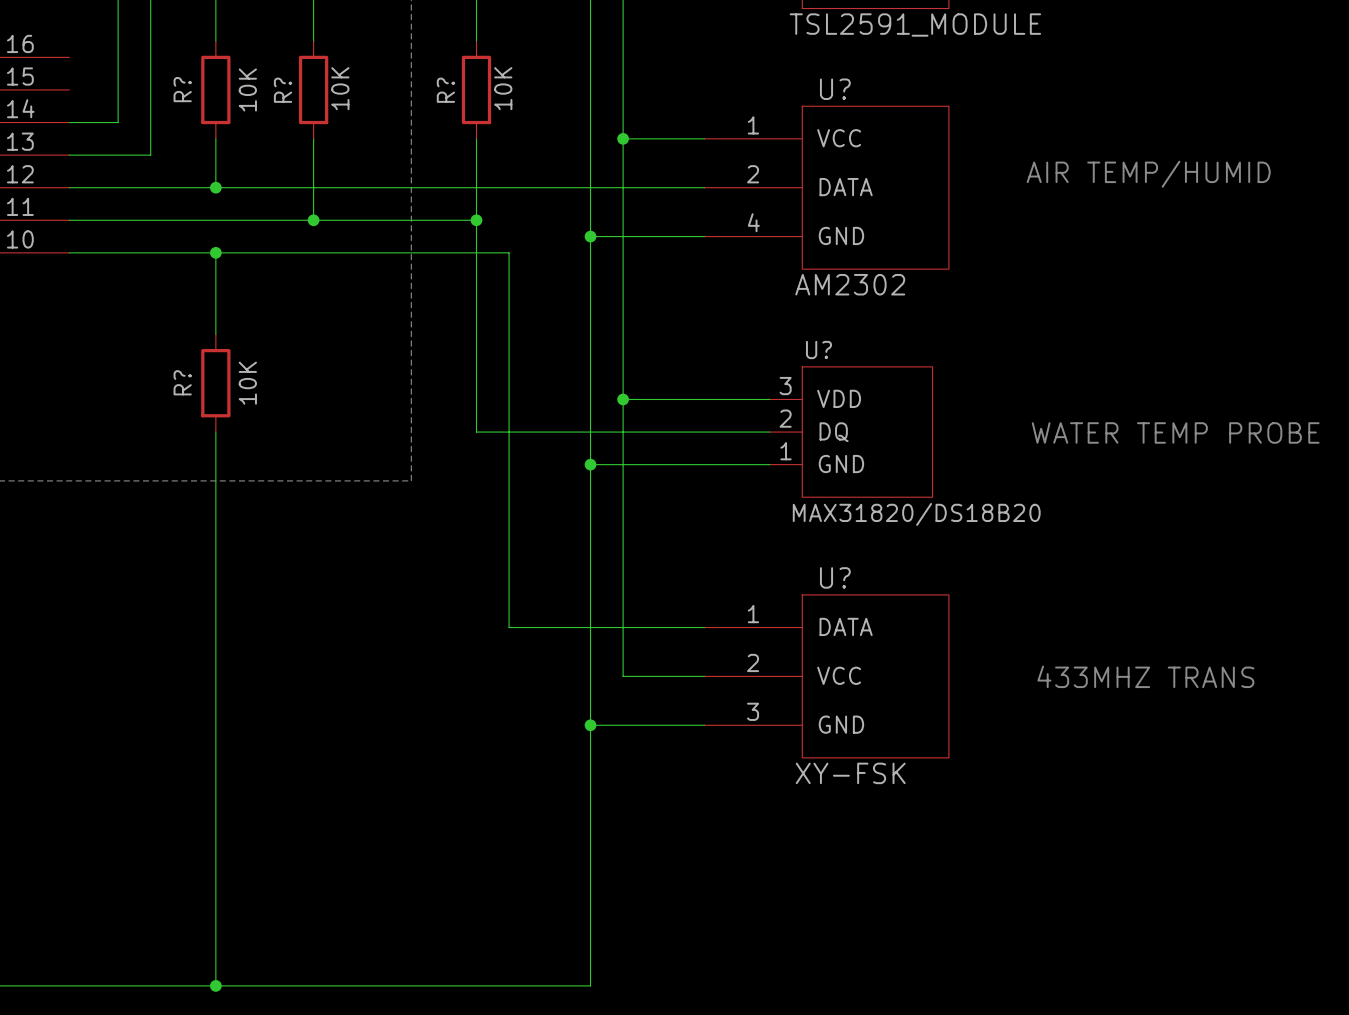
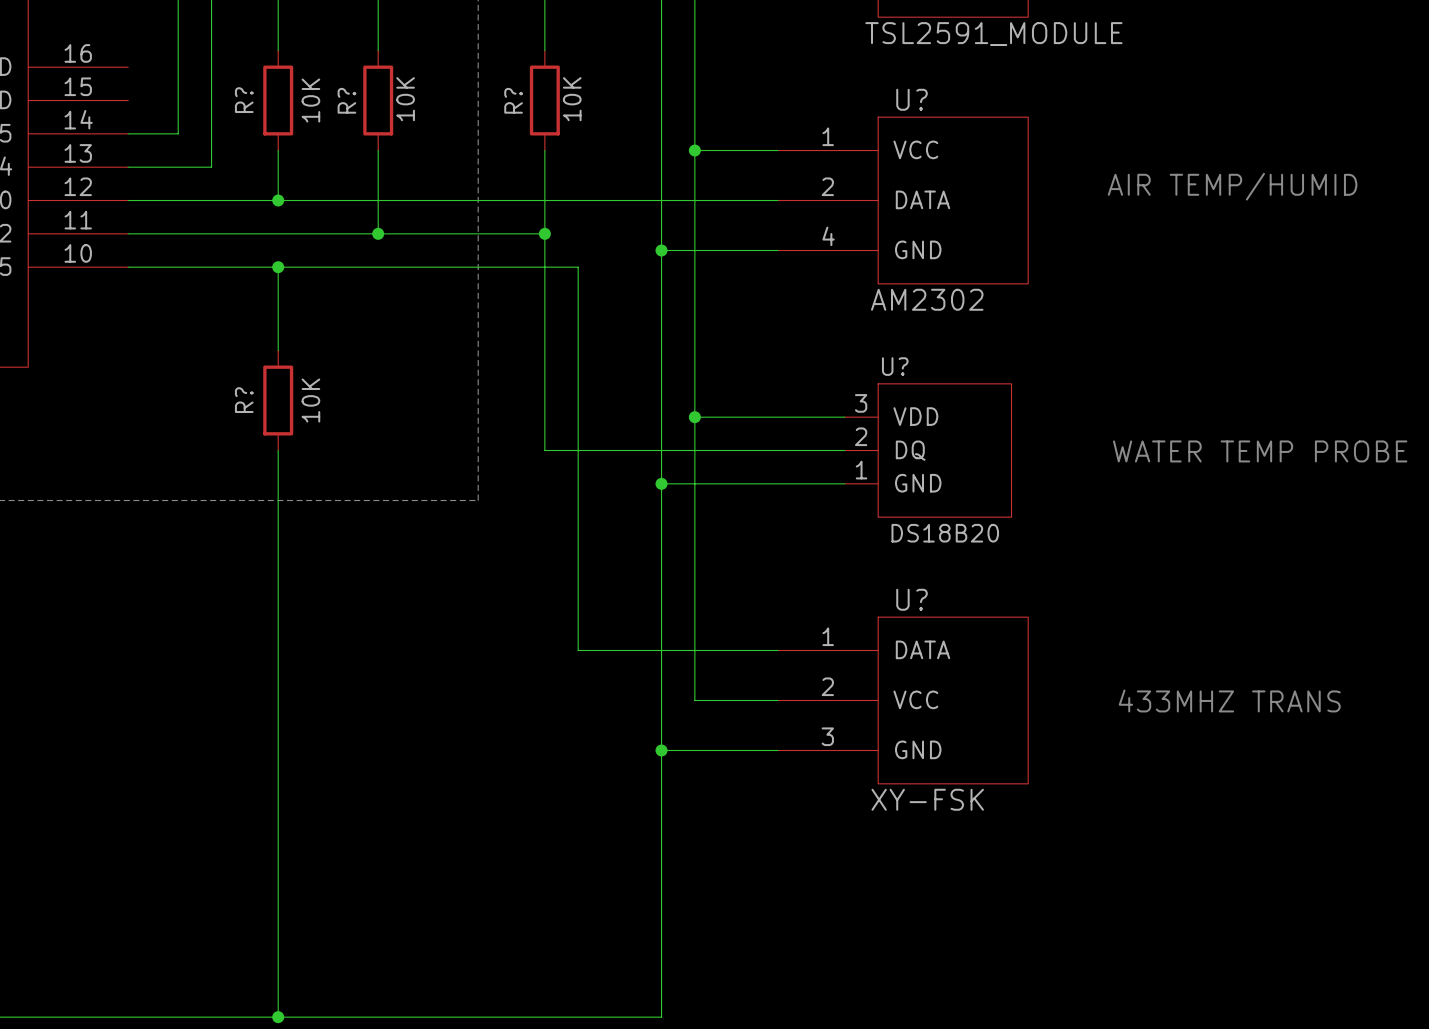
U? value: MAX31820/DS18B20 (916, 514) -> DS18B20 (945, 533)

